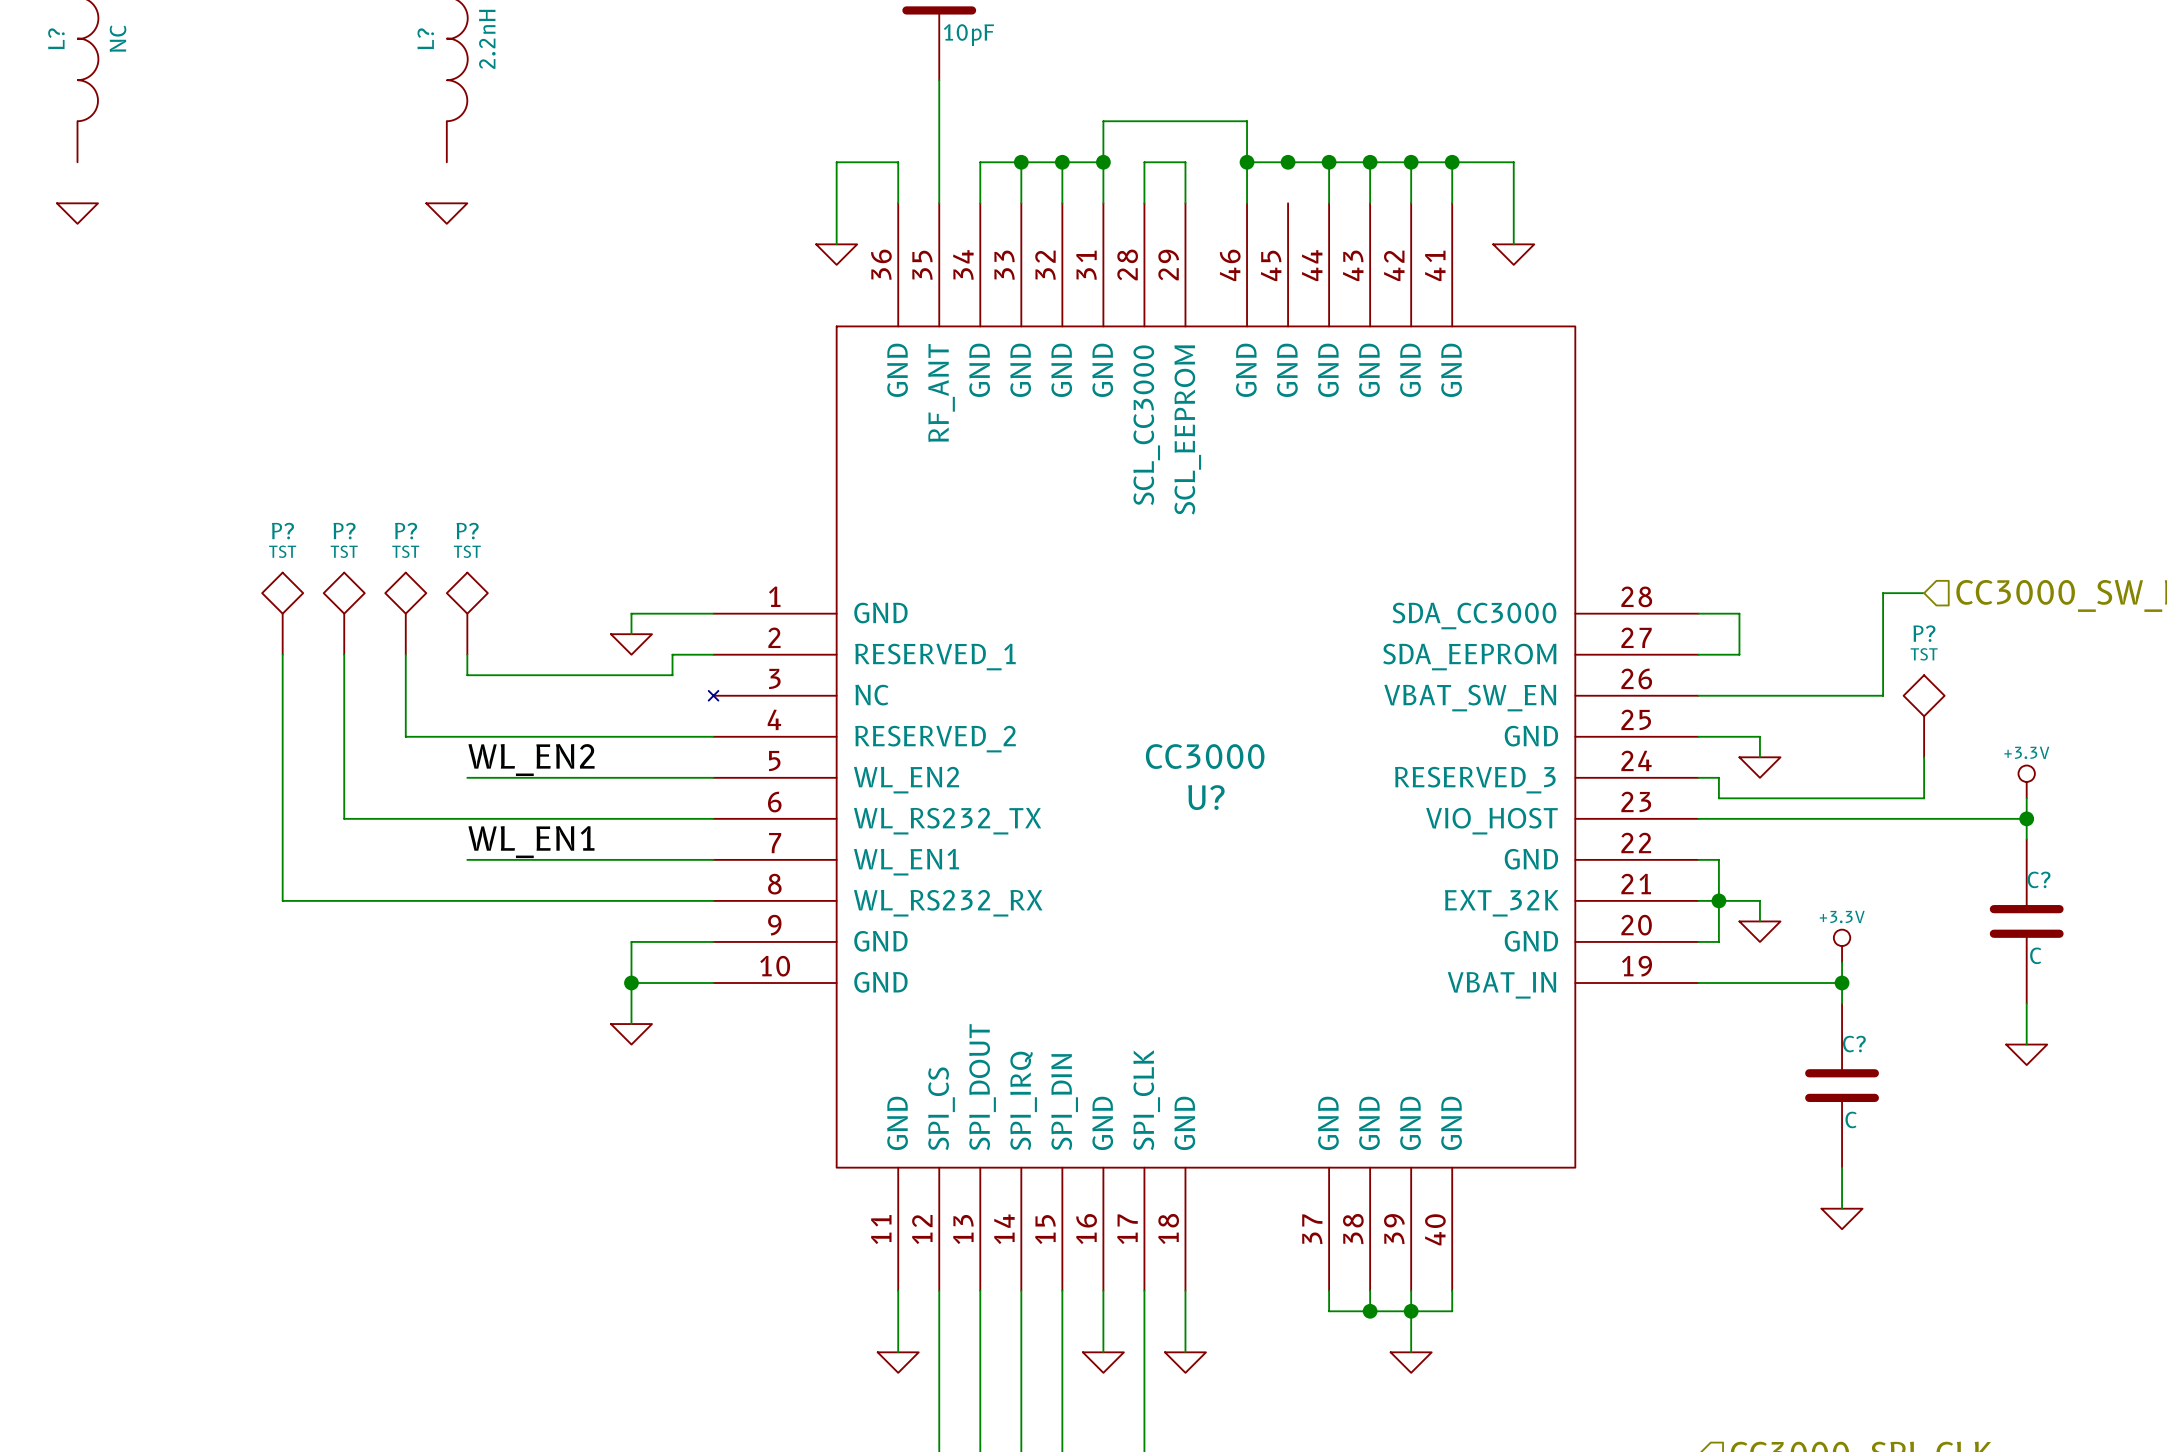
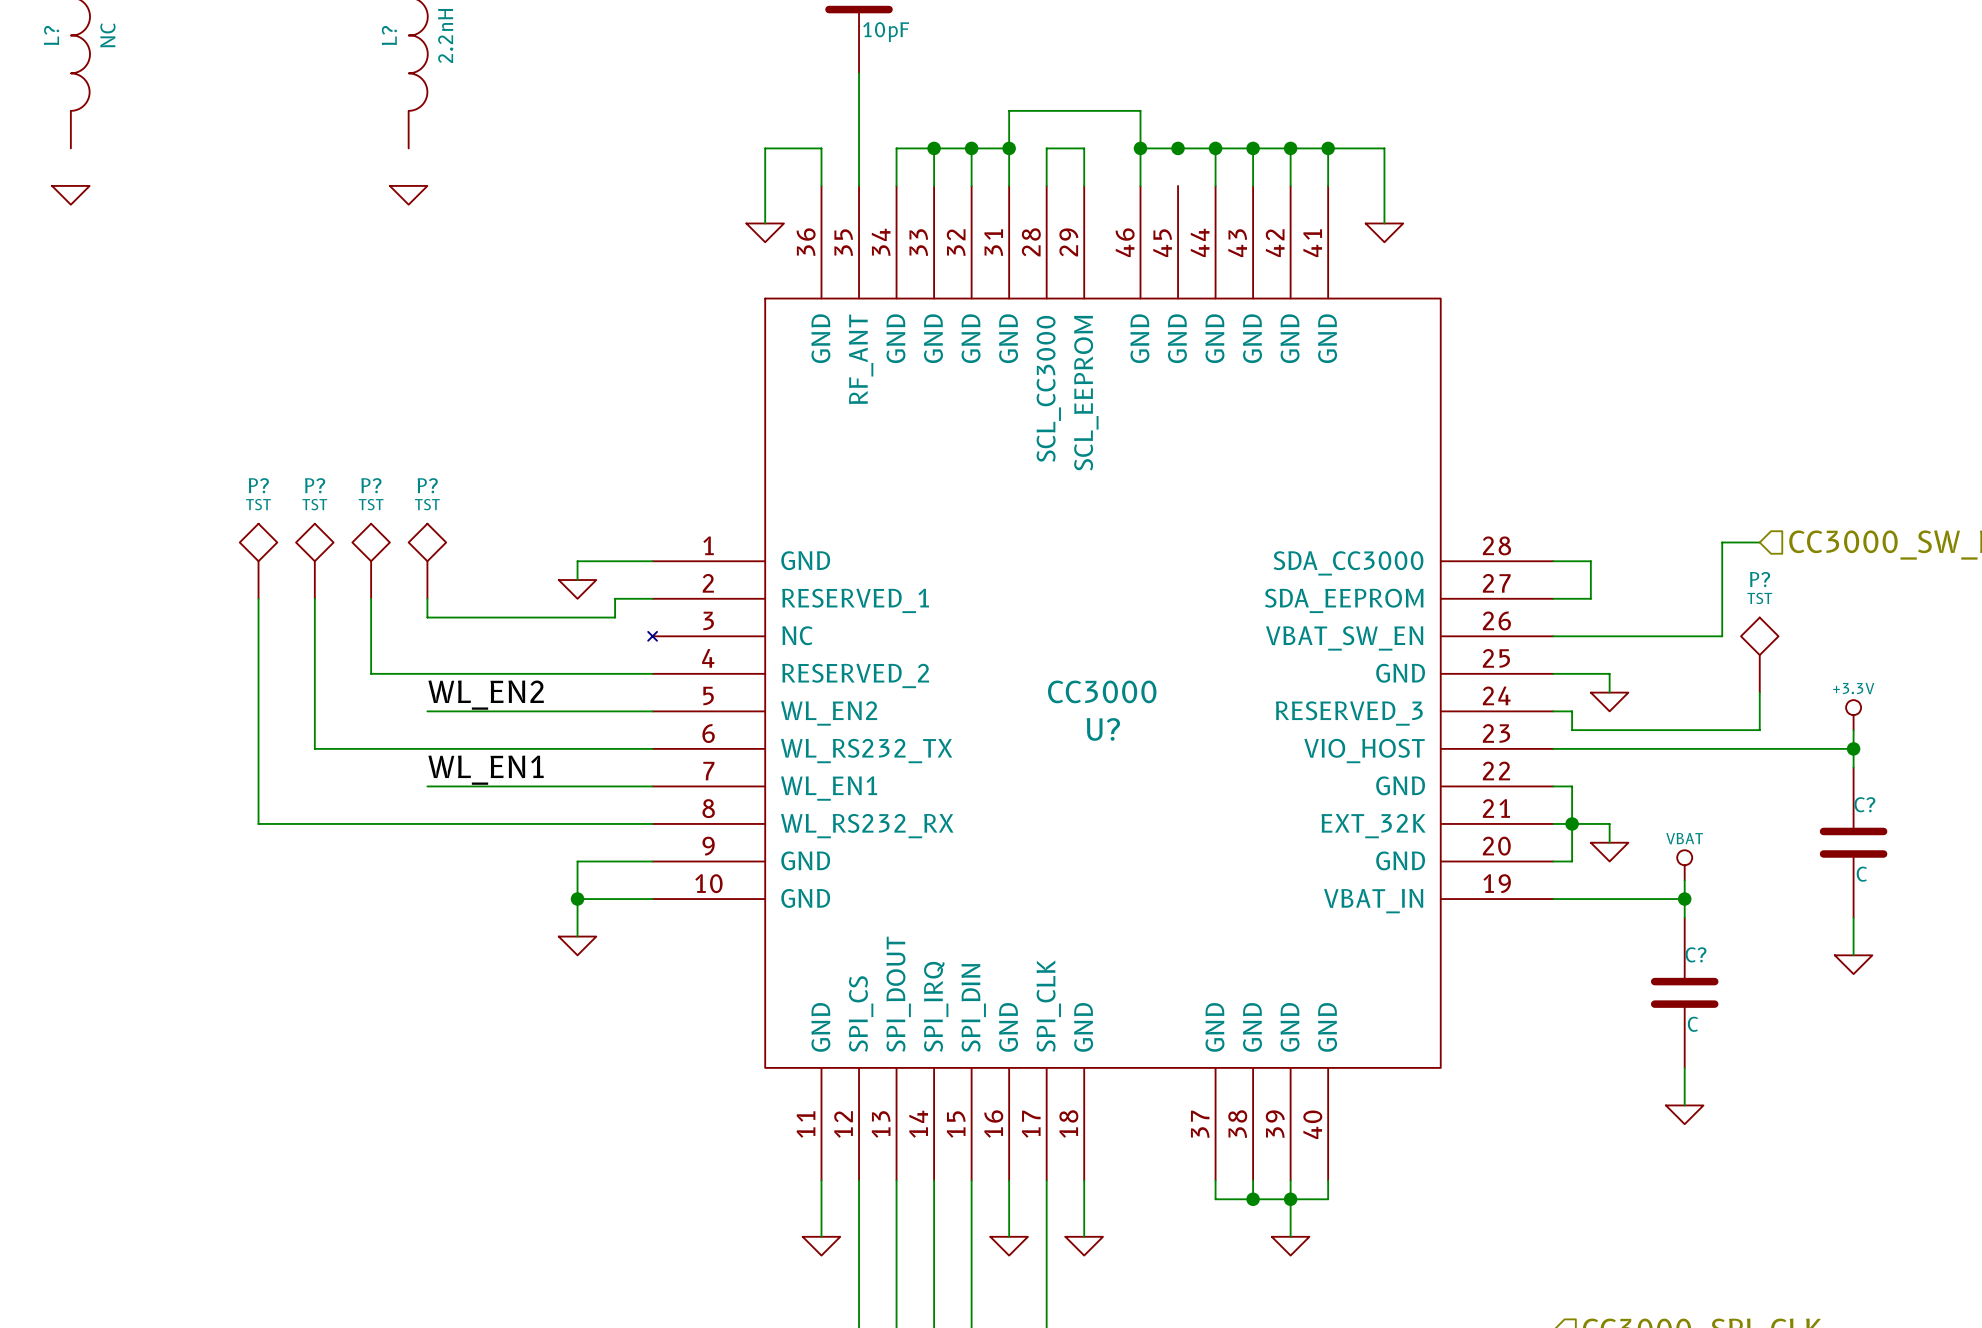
power symbol: +3.3V (1842, 946) -> VBAT (1684, 865)

